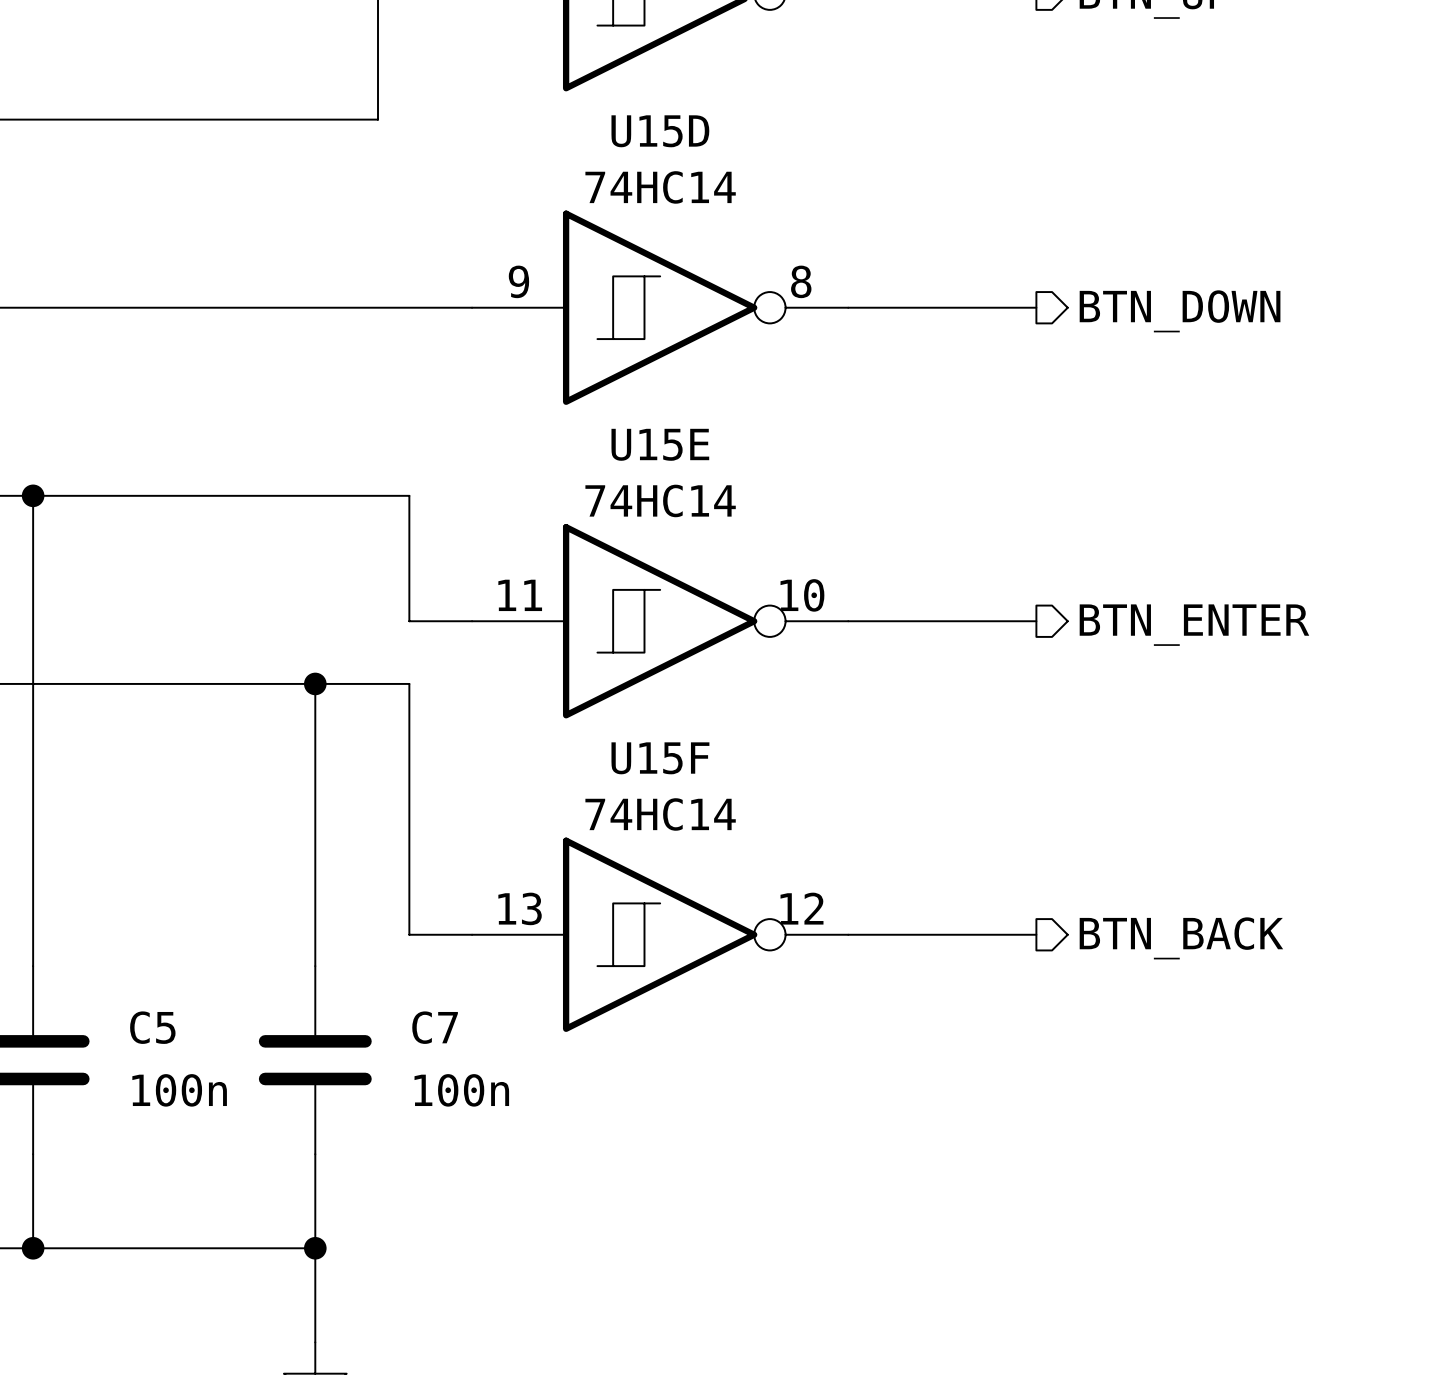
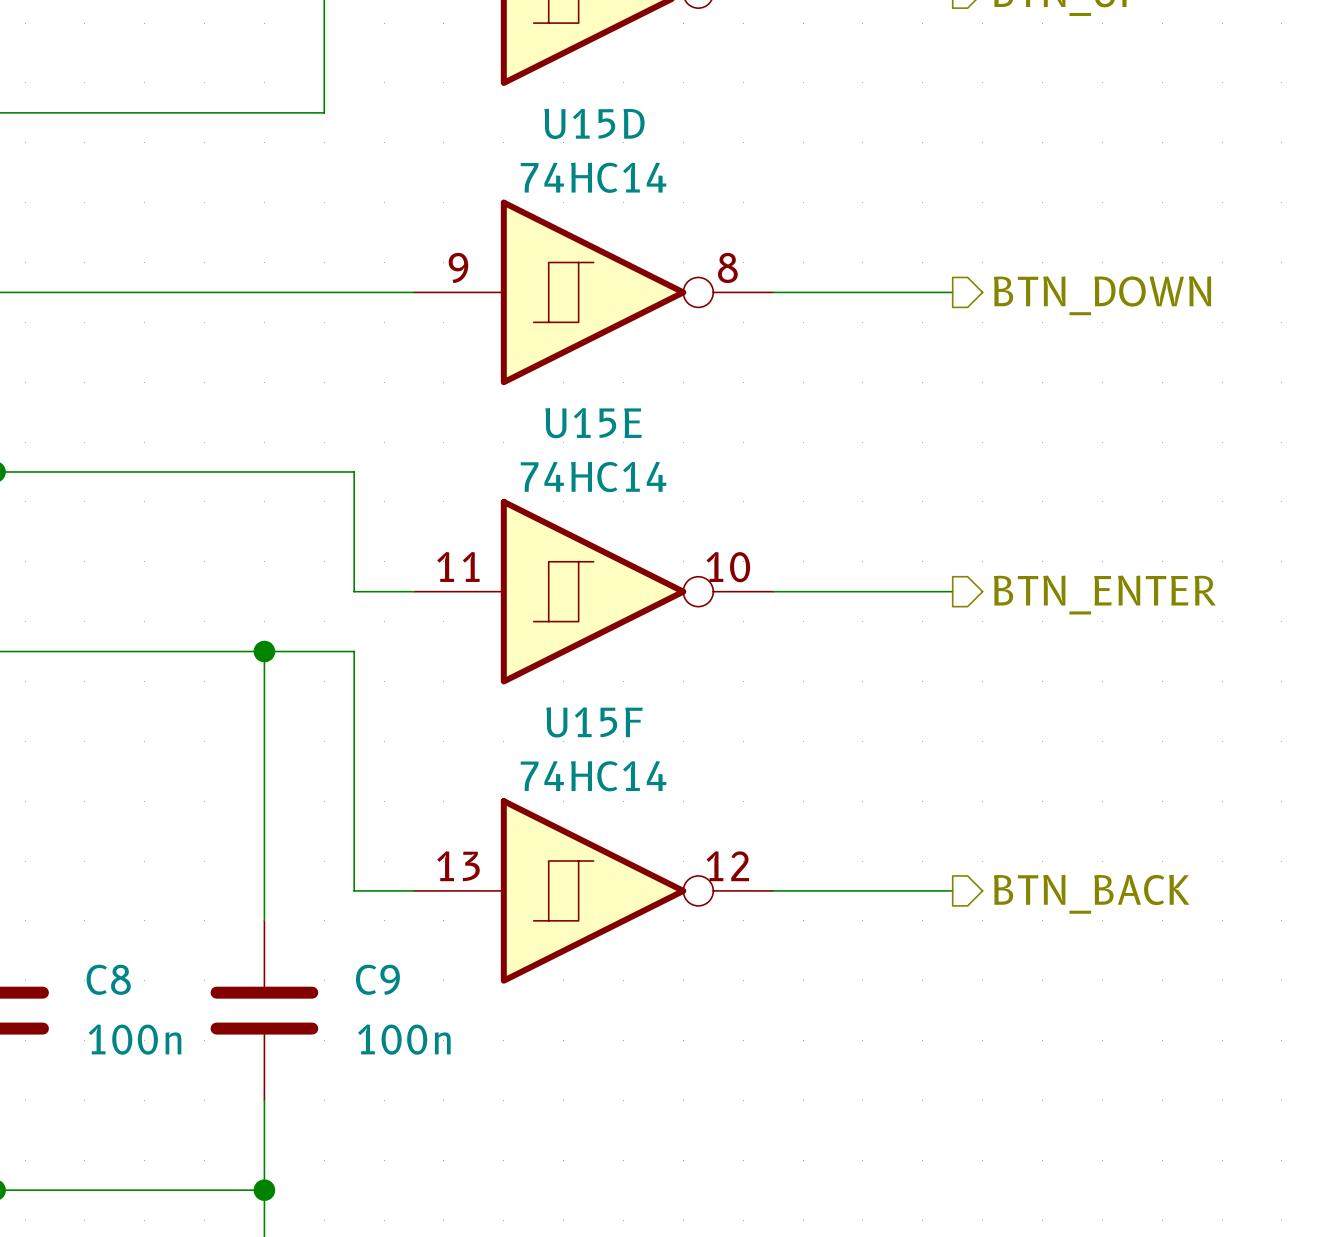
C5 name: C5 (152, 1027) -> C8 (108, 979)
C7 name: C7 (435, 1027) -> C9 (377, 979)

